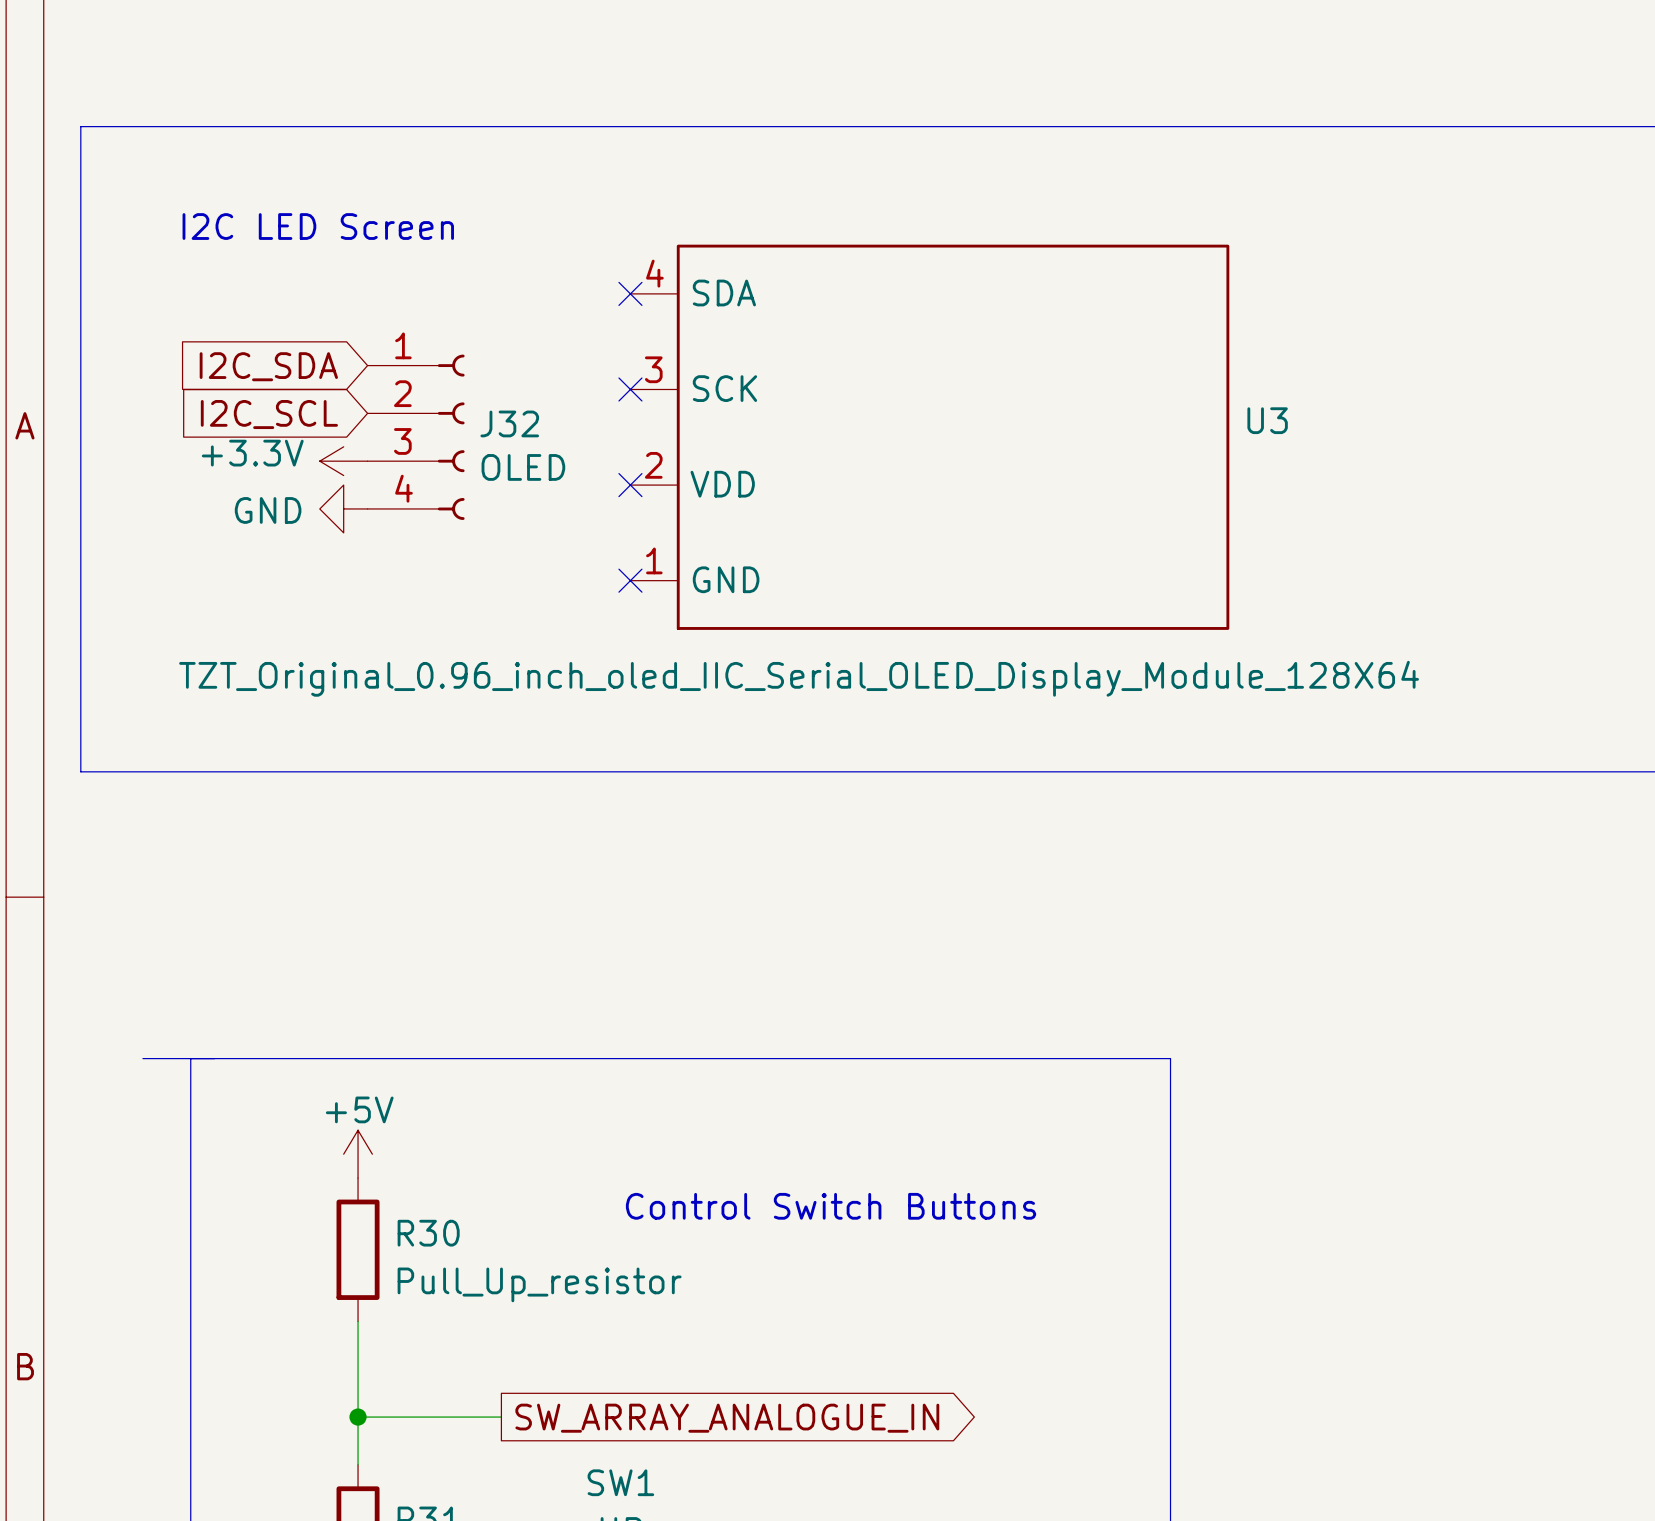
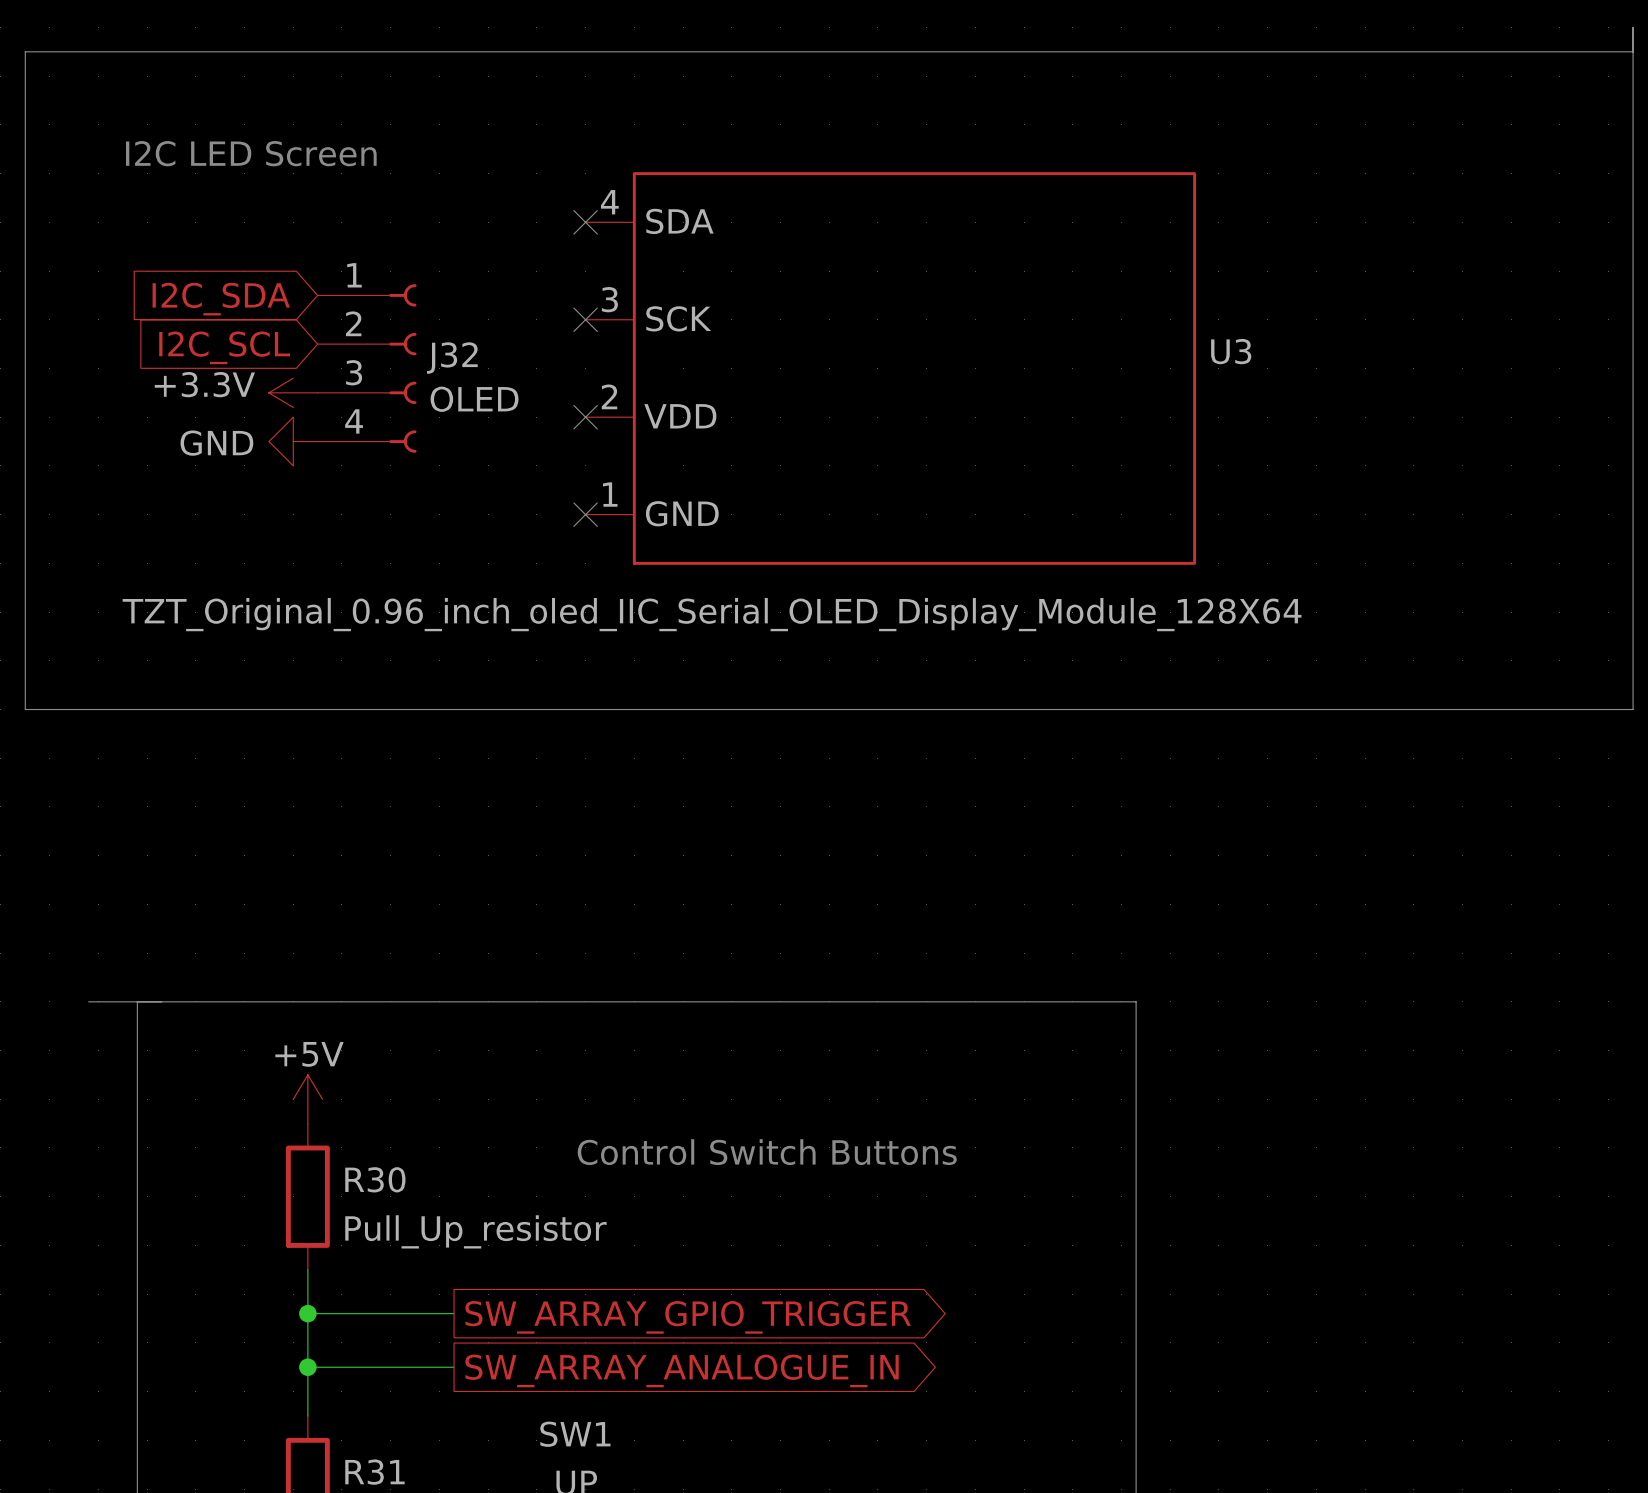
wire: none -> (307, 1313) (454, 1313)
junction: none -> (307, 1313)
global label: none -> SW_ARRAY_GPIO_TRIGGER (688, 1317)

